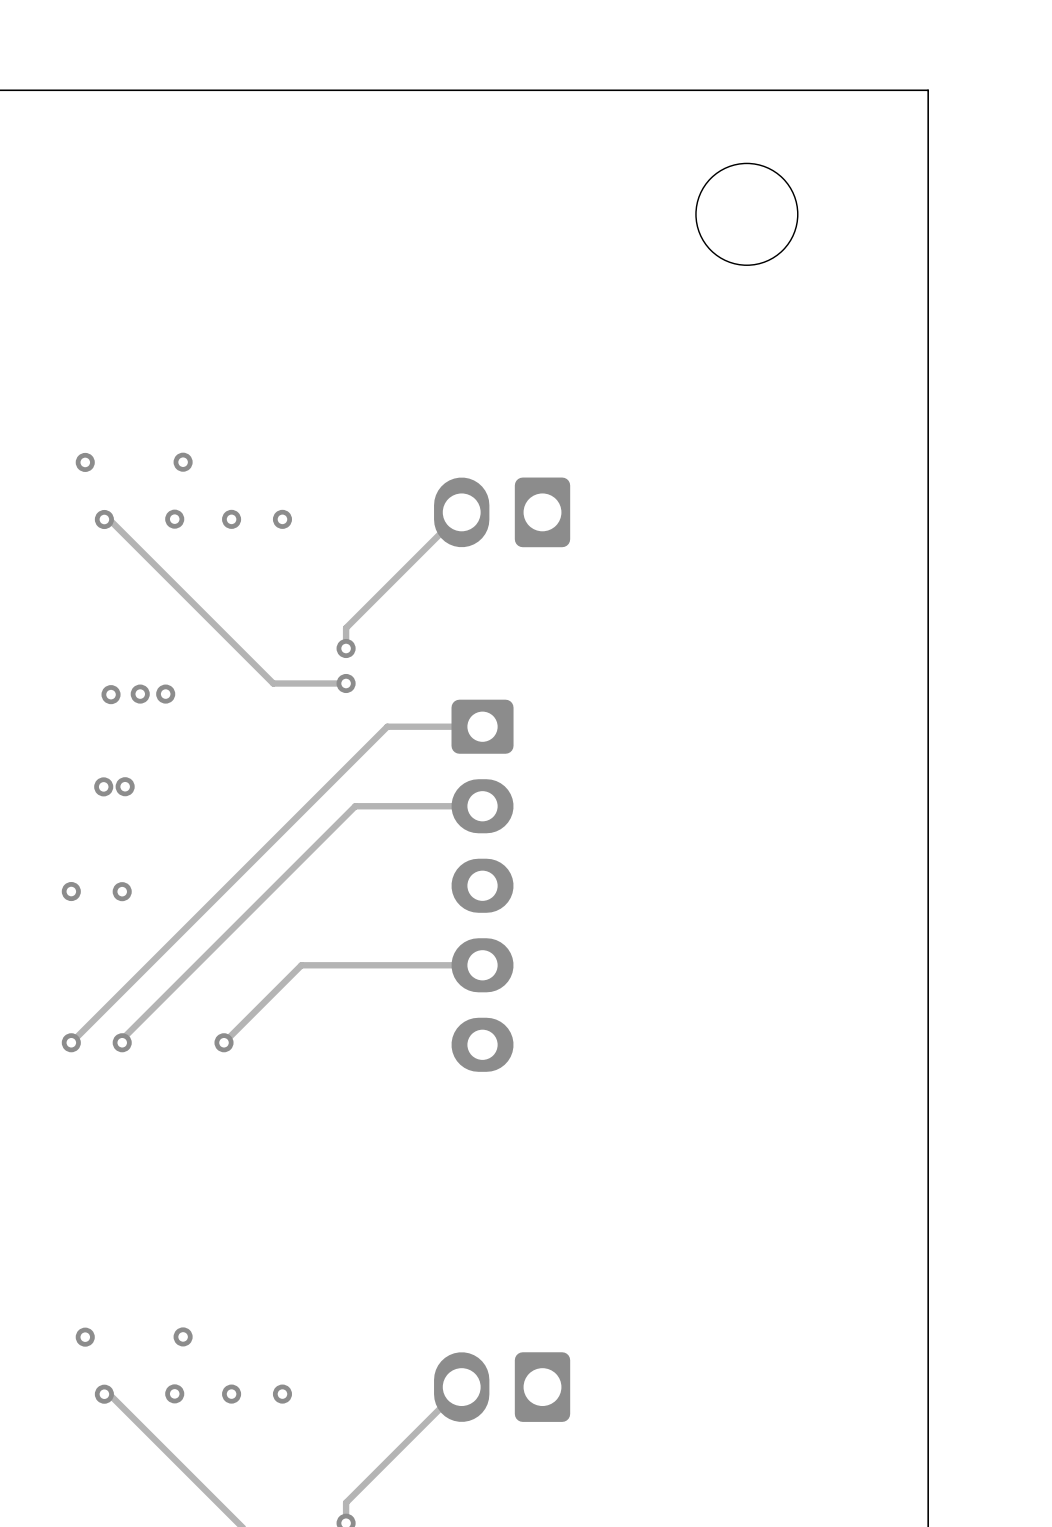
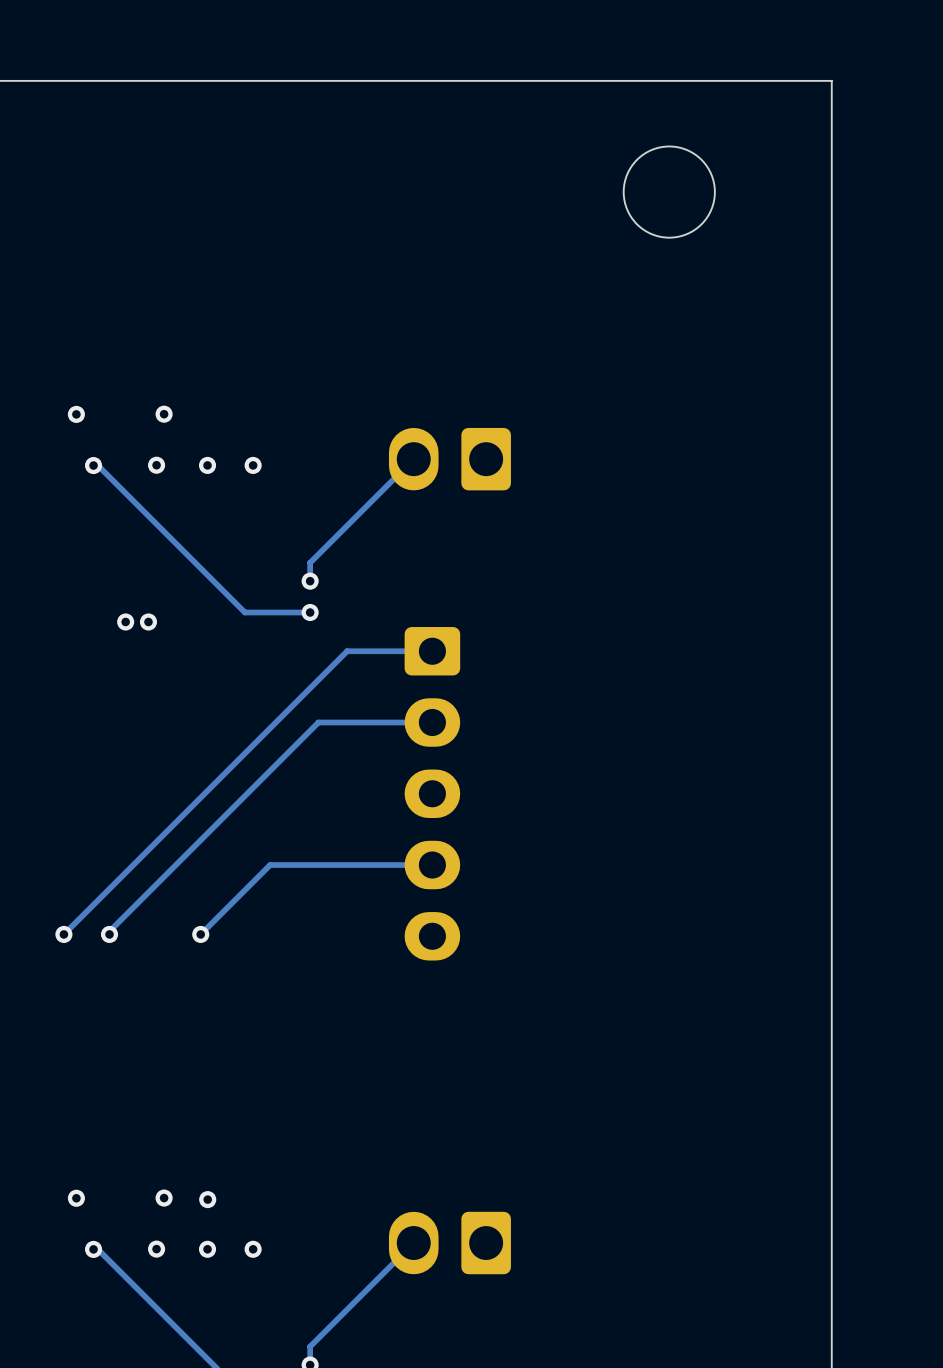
via: (111, 694) -> none
via: (103, 786) -> none
via: (125, 786) -> none
via: (71, 891) -> none
via: (122, 891) -> none
via: none -> (207, 1199)

